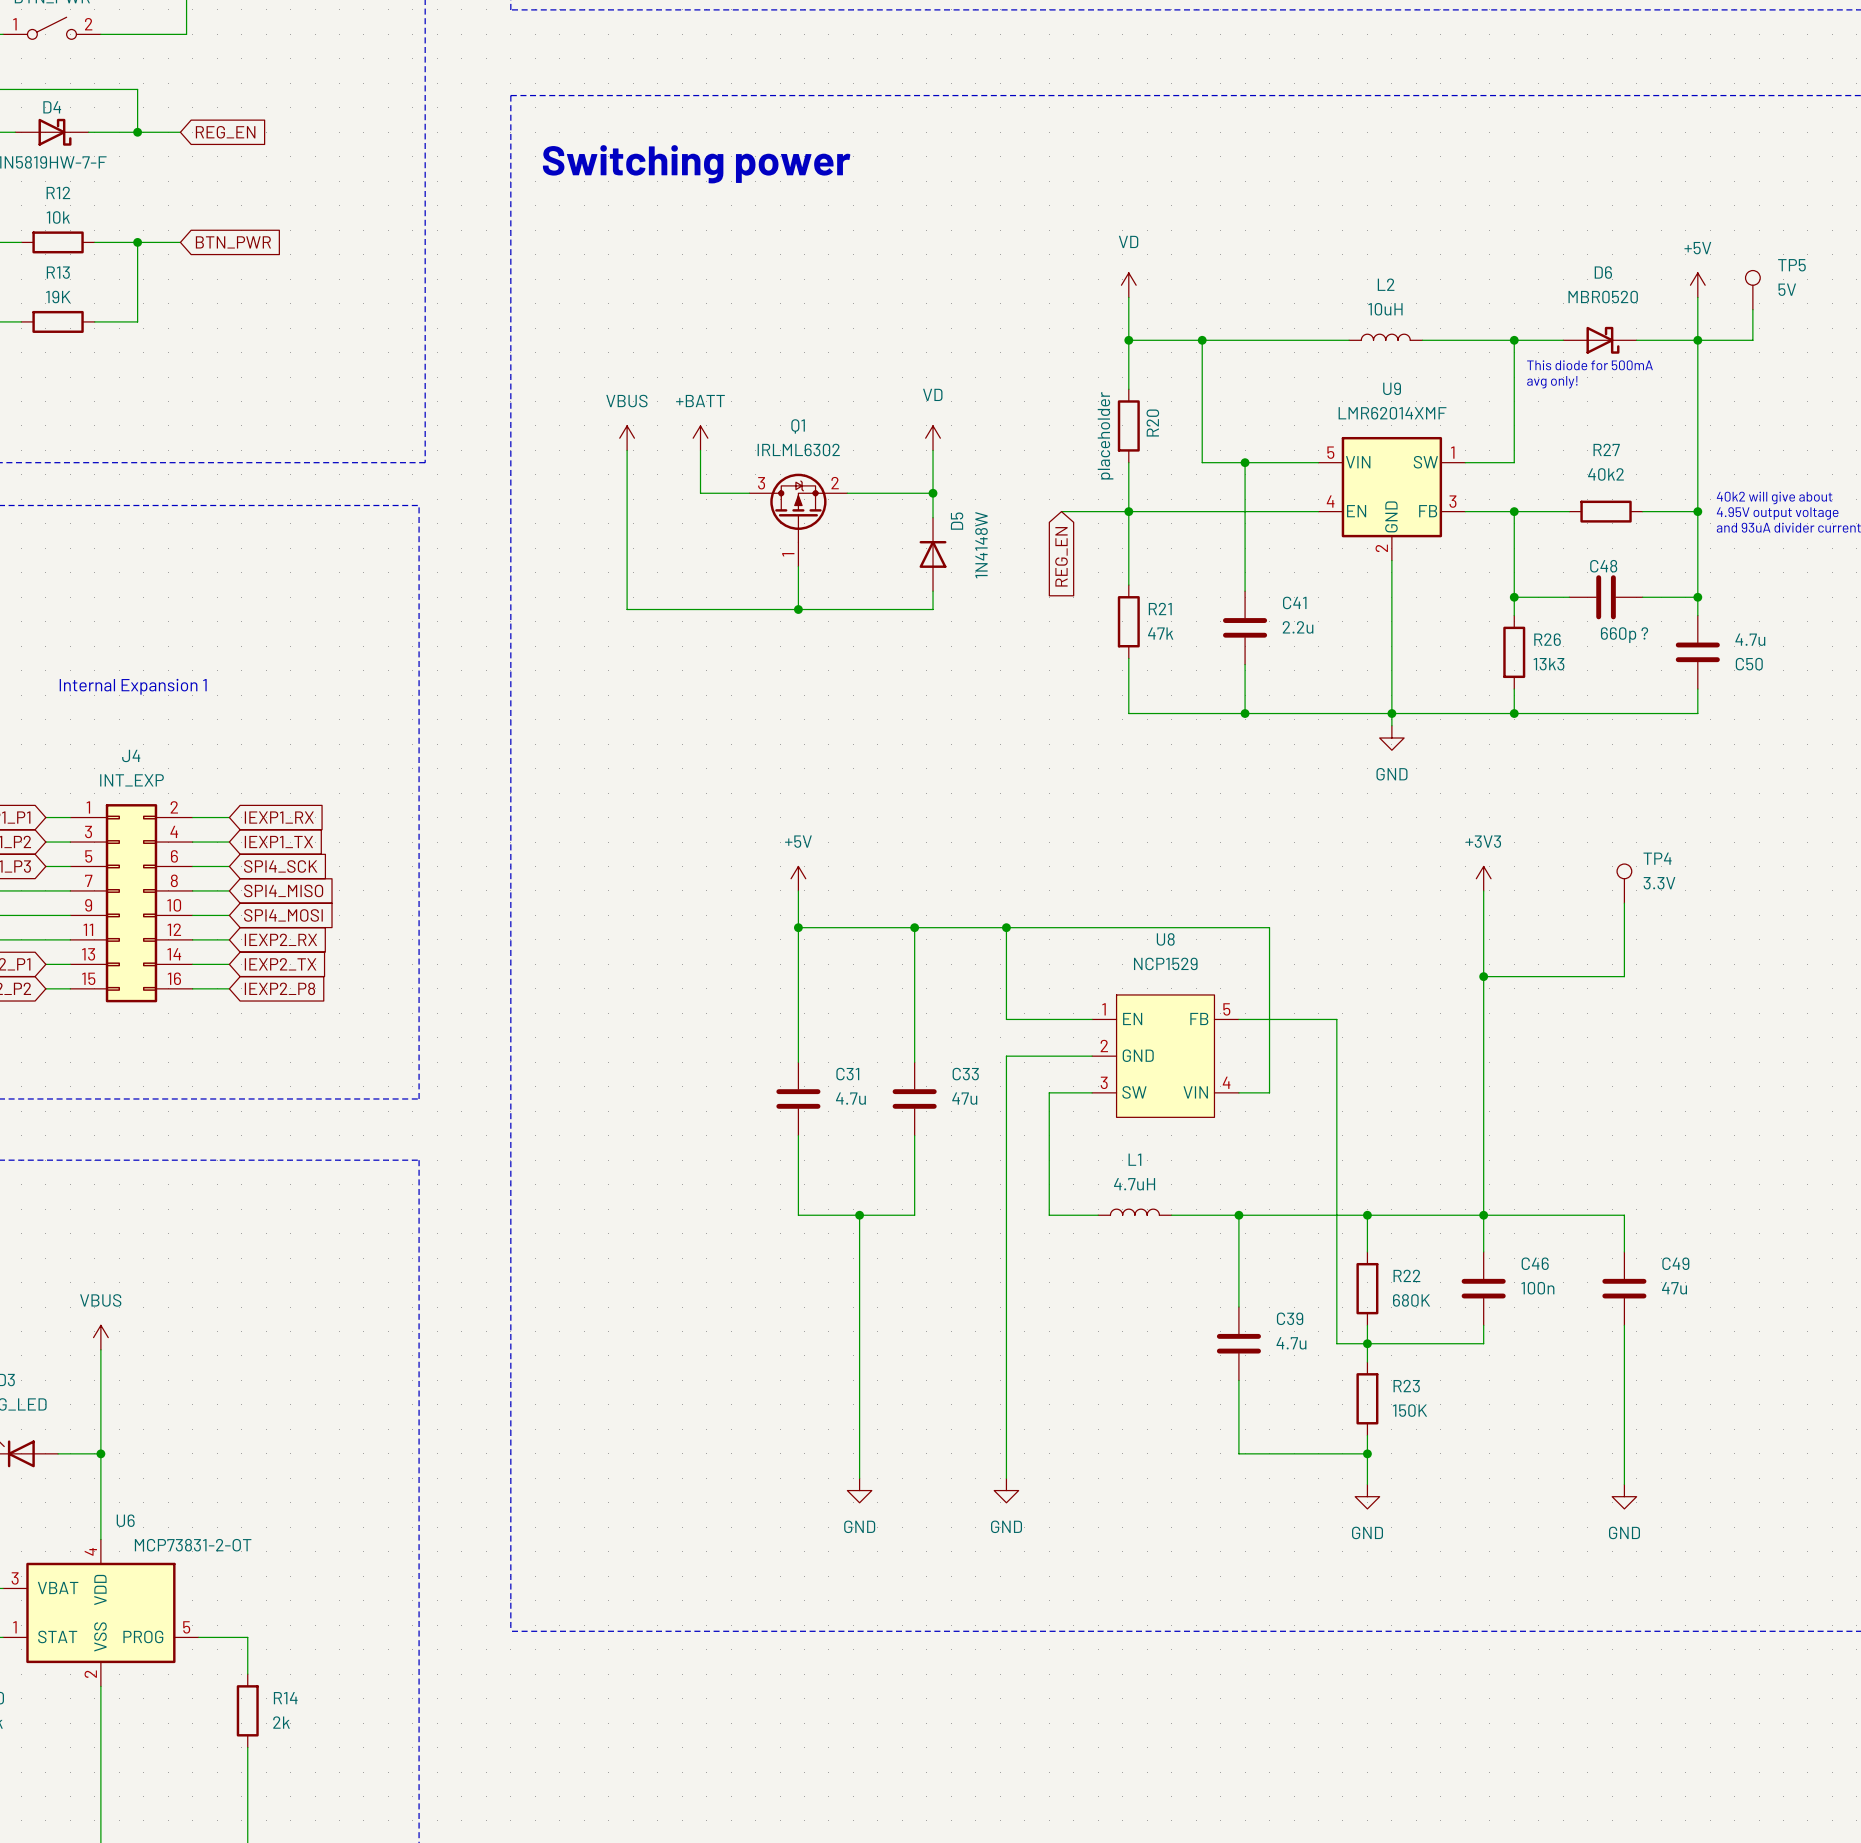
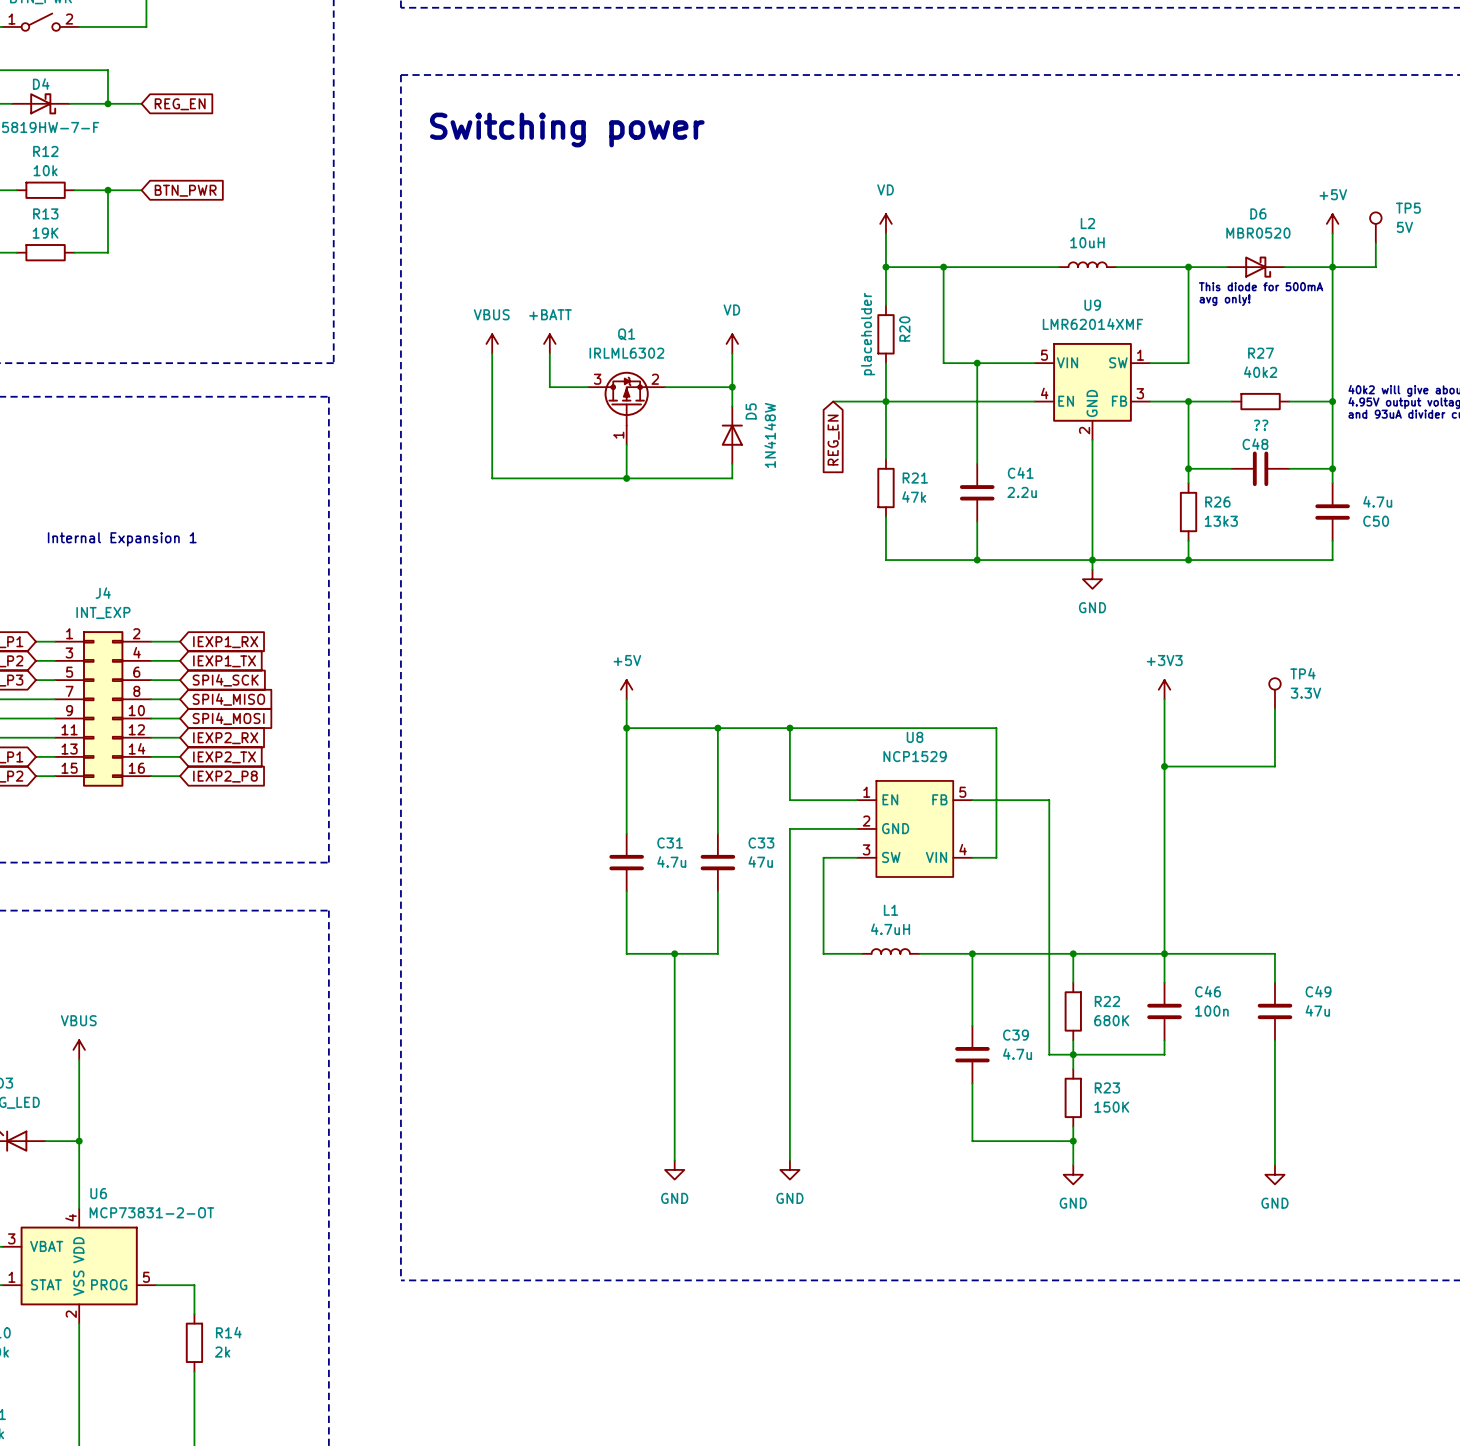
C48 value: 660p ? (1624, 635) -> ?? (1261, 425)

